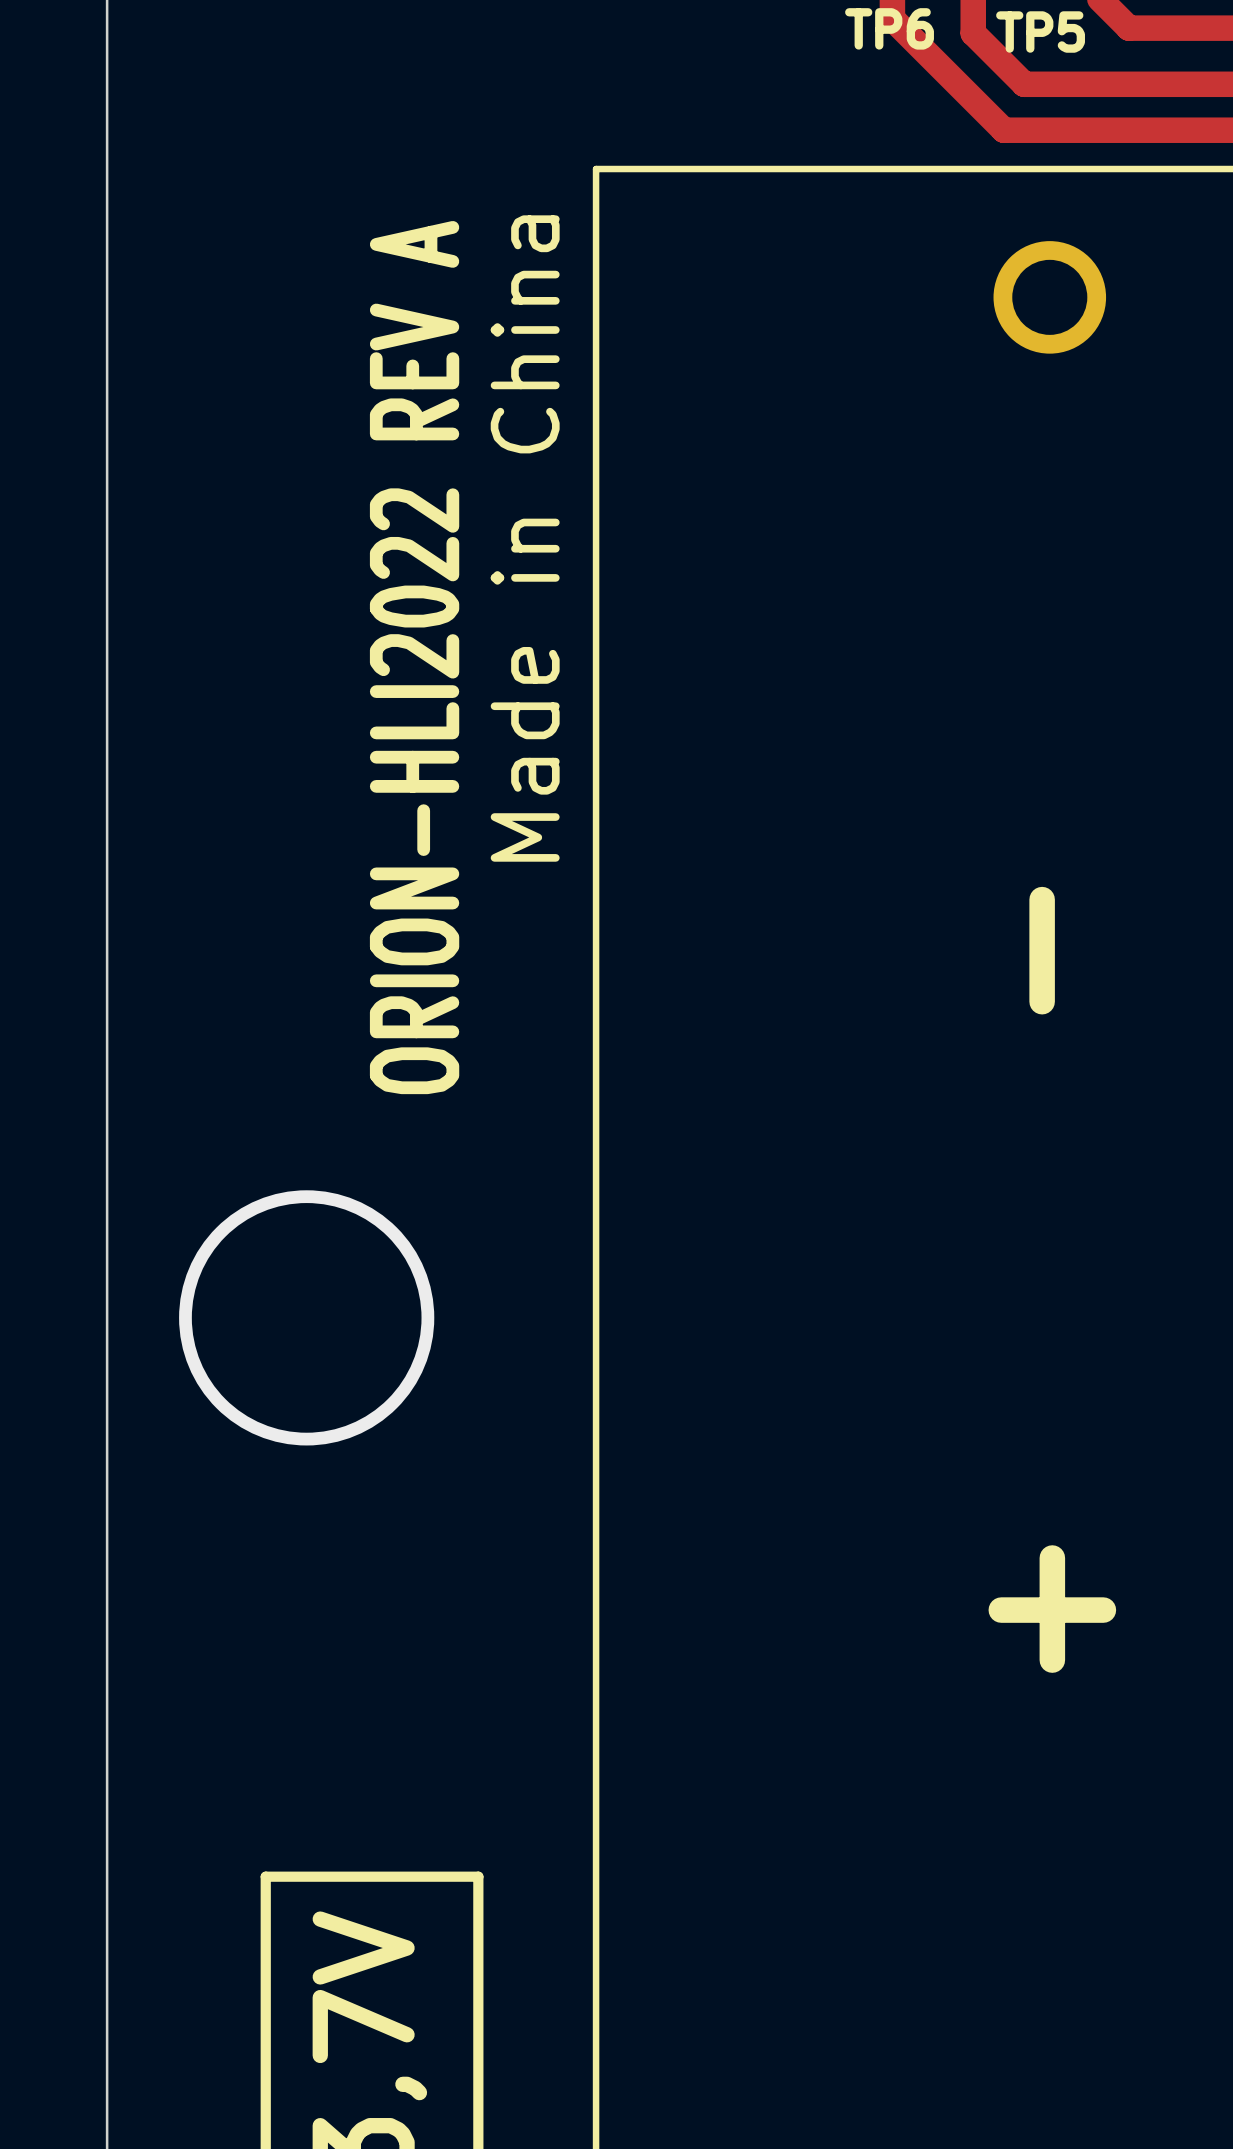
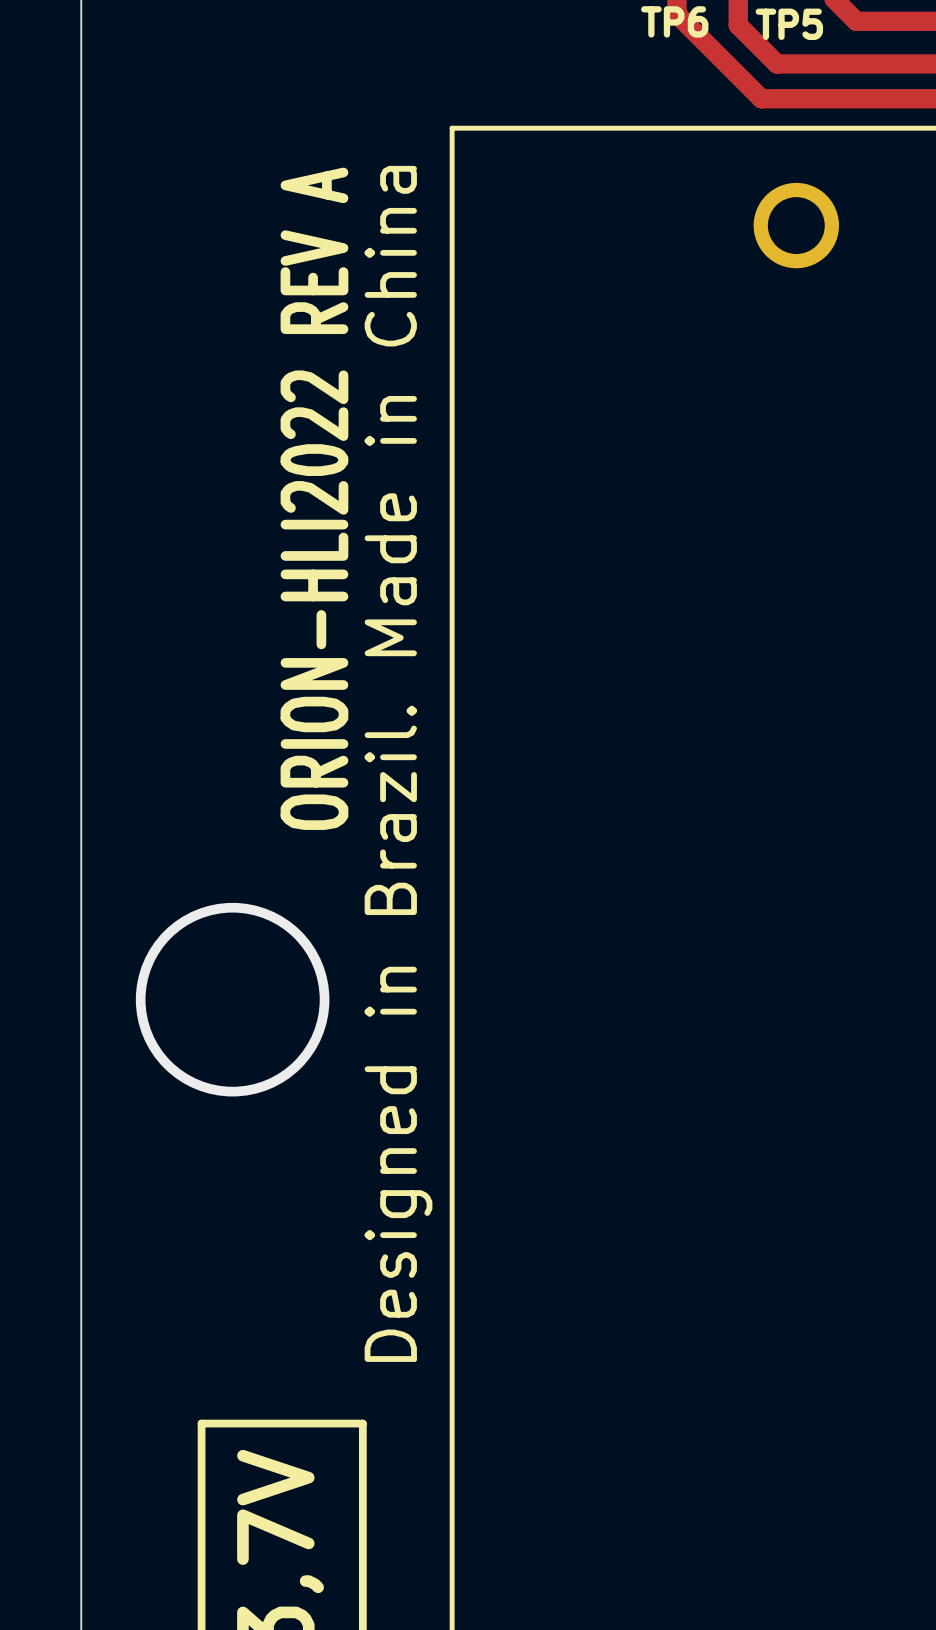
text: Made in China (525, 538) -> none
line: (1042, 899) (1042, 1001) -> none
text: none -> Designed in Brazil. Made in China (398, 763)
line: (1052, 1558) (1052, 1660) -> none
line: (1001, 1610) (1103, 1610) -> none

